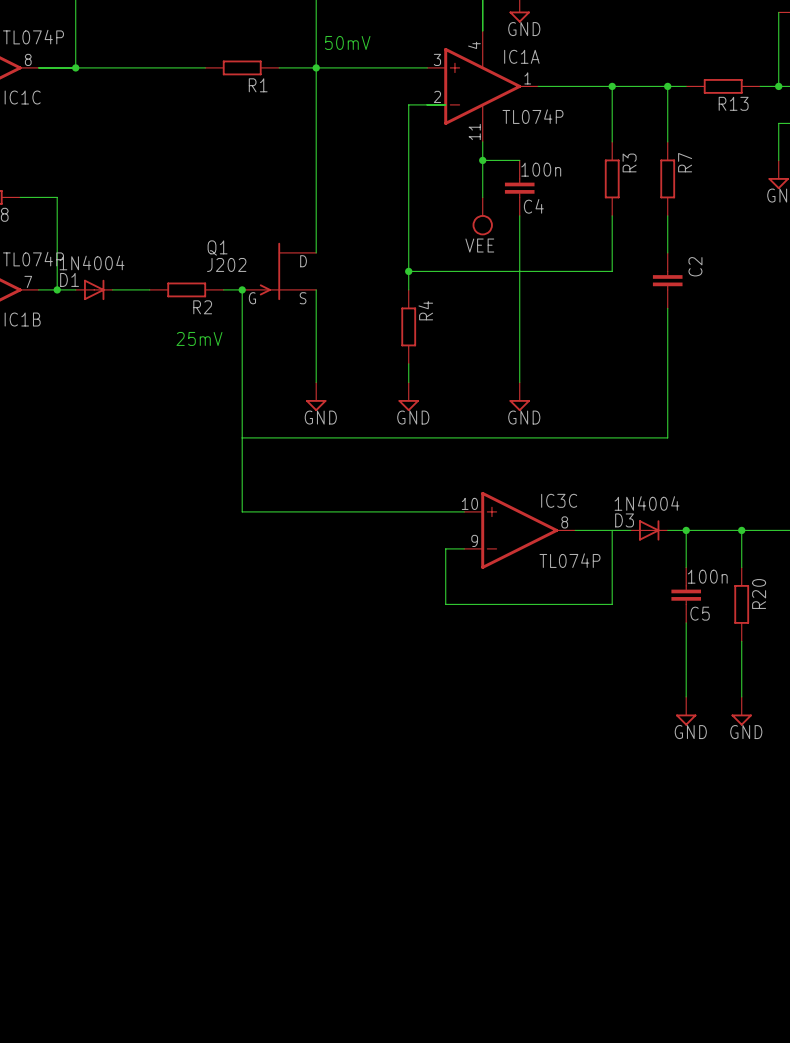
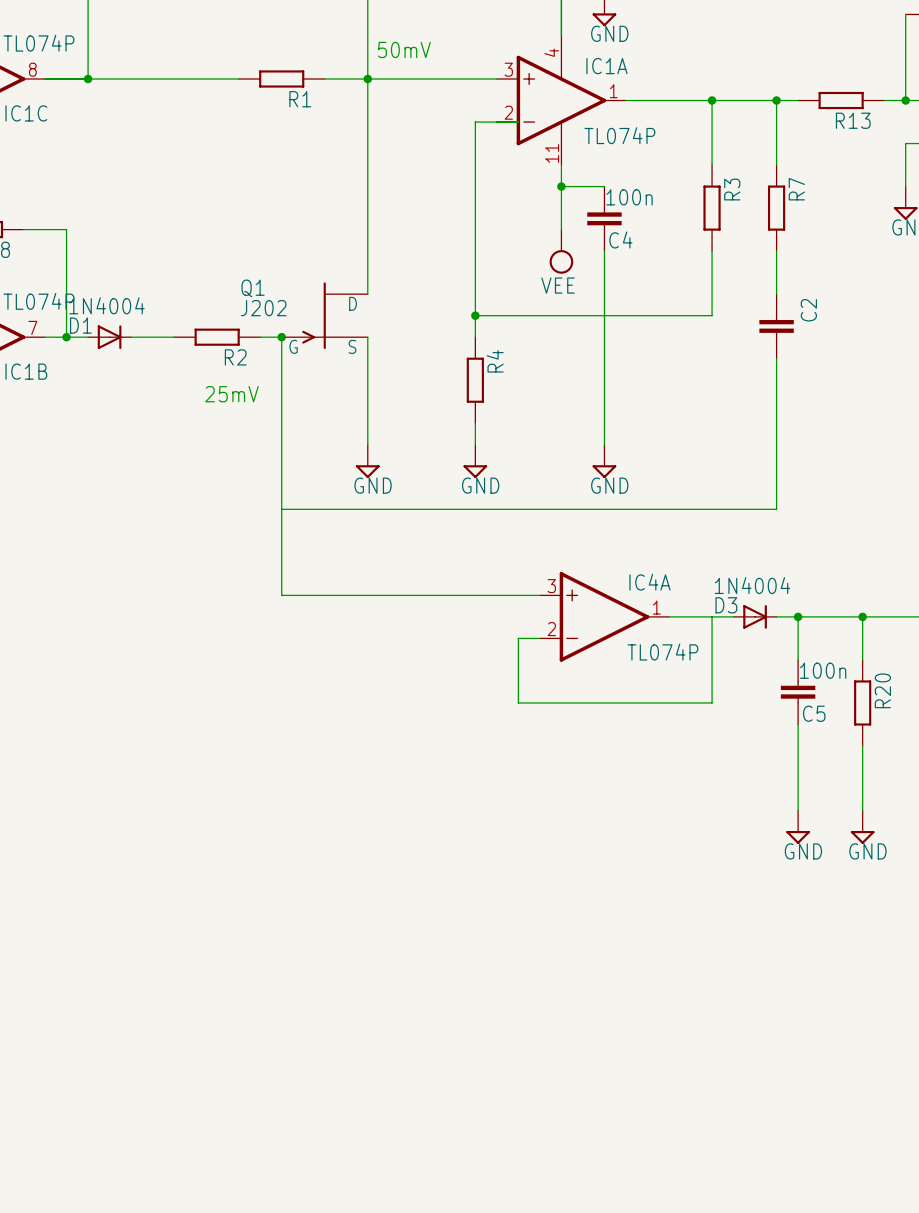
IC3C name: IC3C (559, 500) -> IC4A (650, 582)
IC3C pin number: 10 (469, 503) -> 3 (551, 586)
IC3C pin number: 8 (564, 522) -> 1 (656, 607)
IC3C pin number: 9 (474, 540) -> 2 (551, 629)

